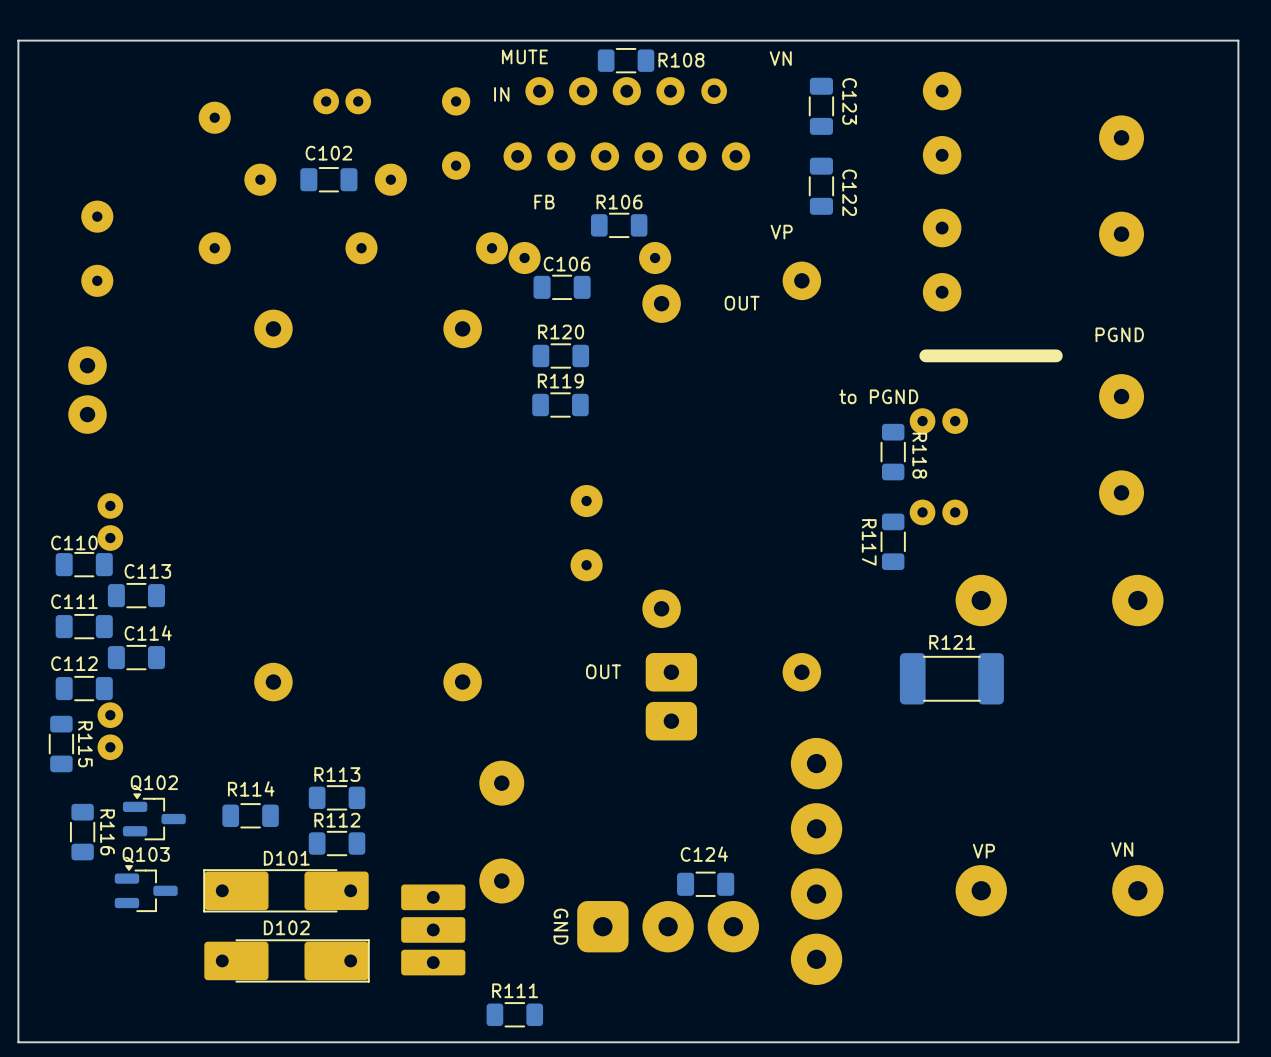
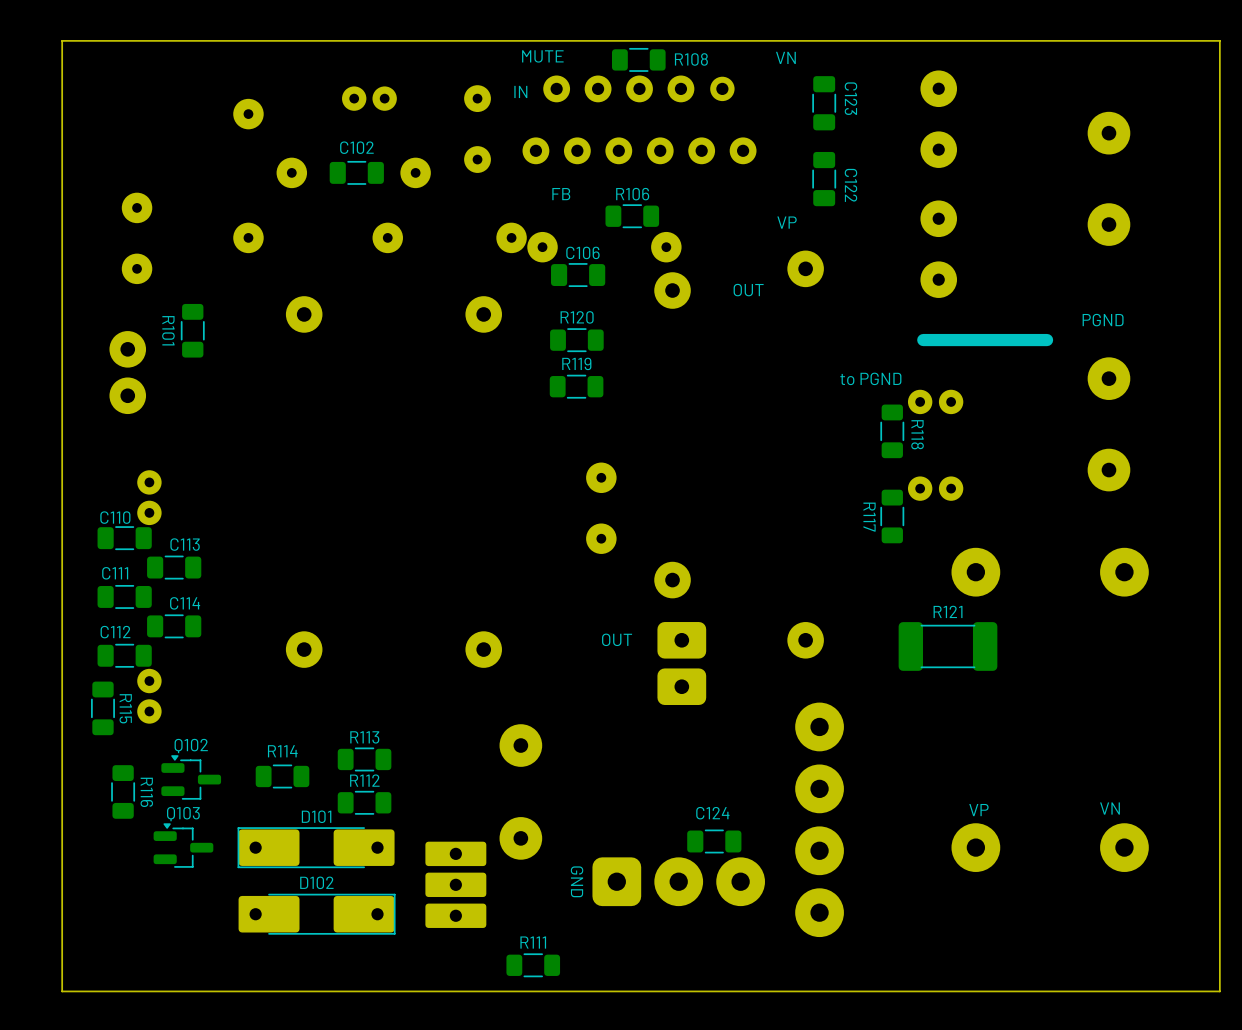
R101: none -> (192, 330)

